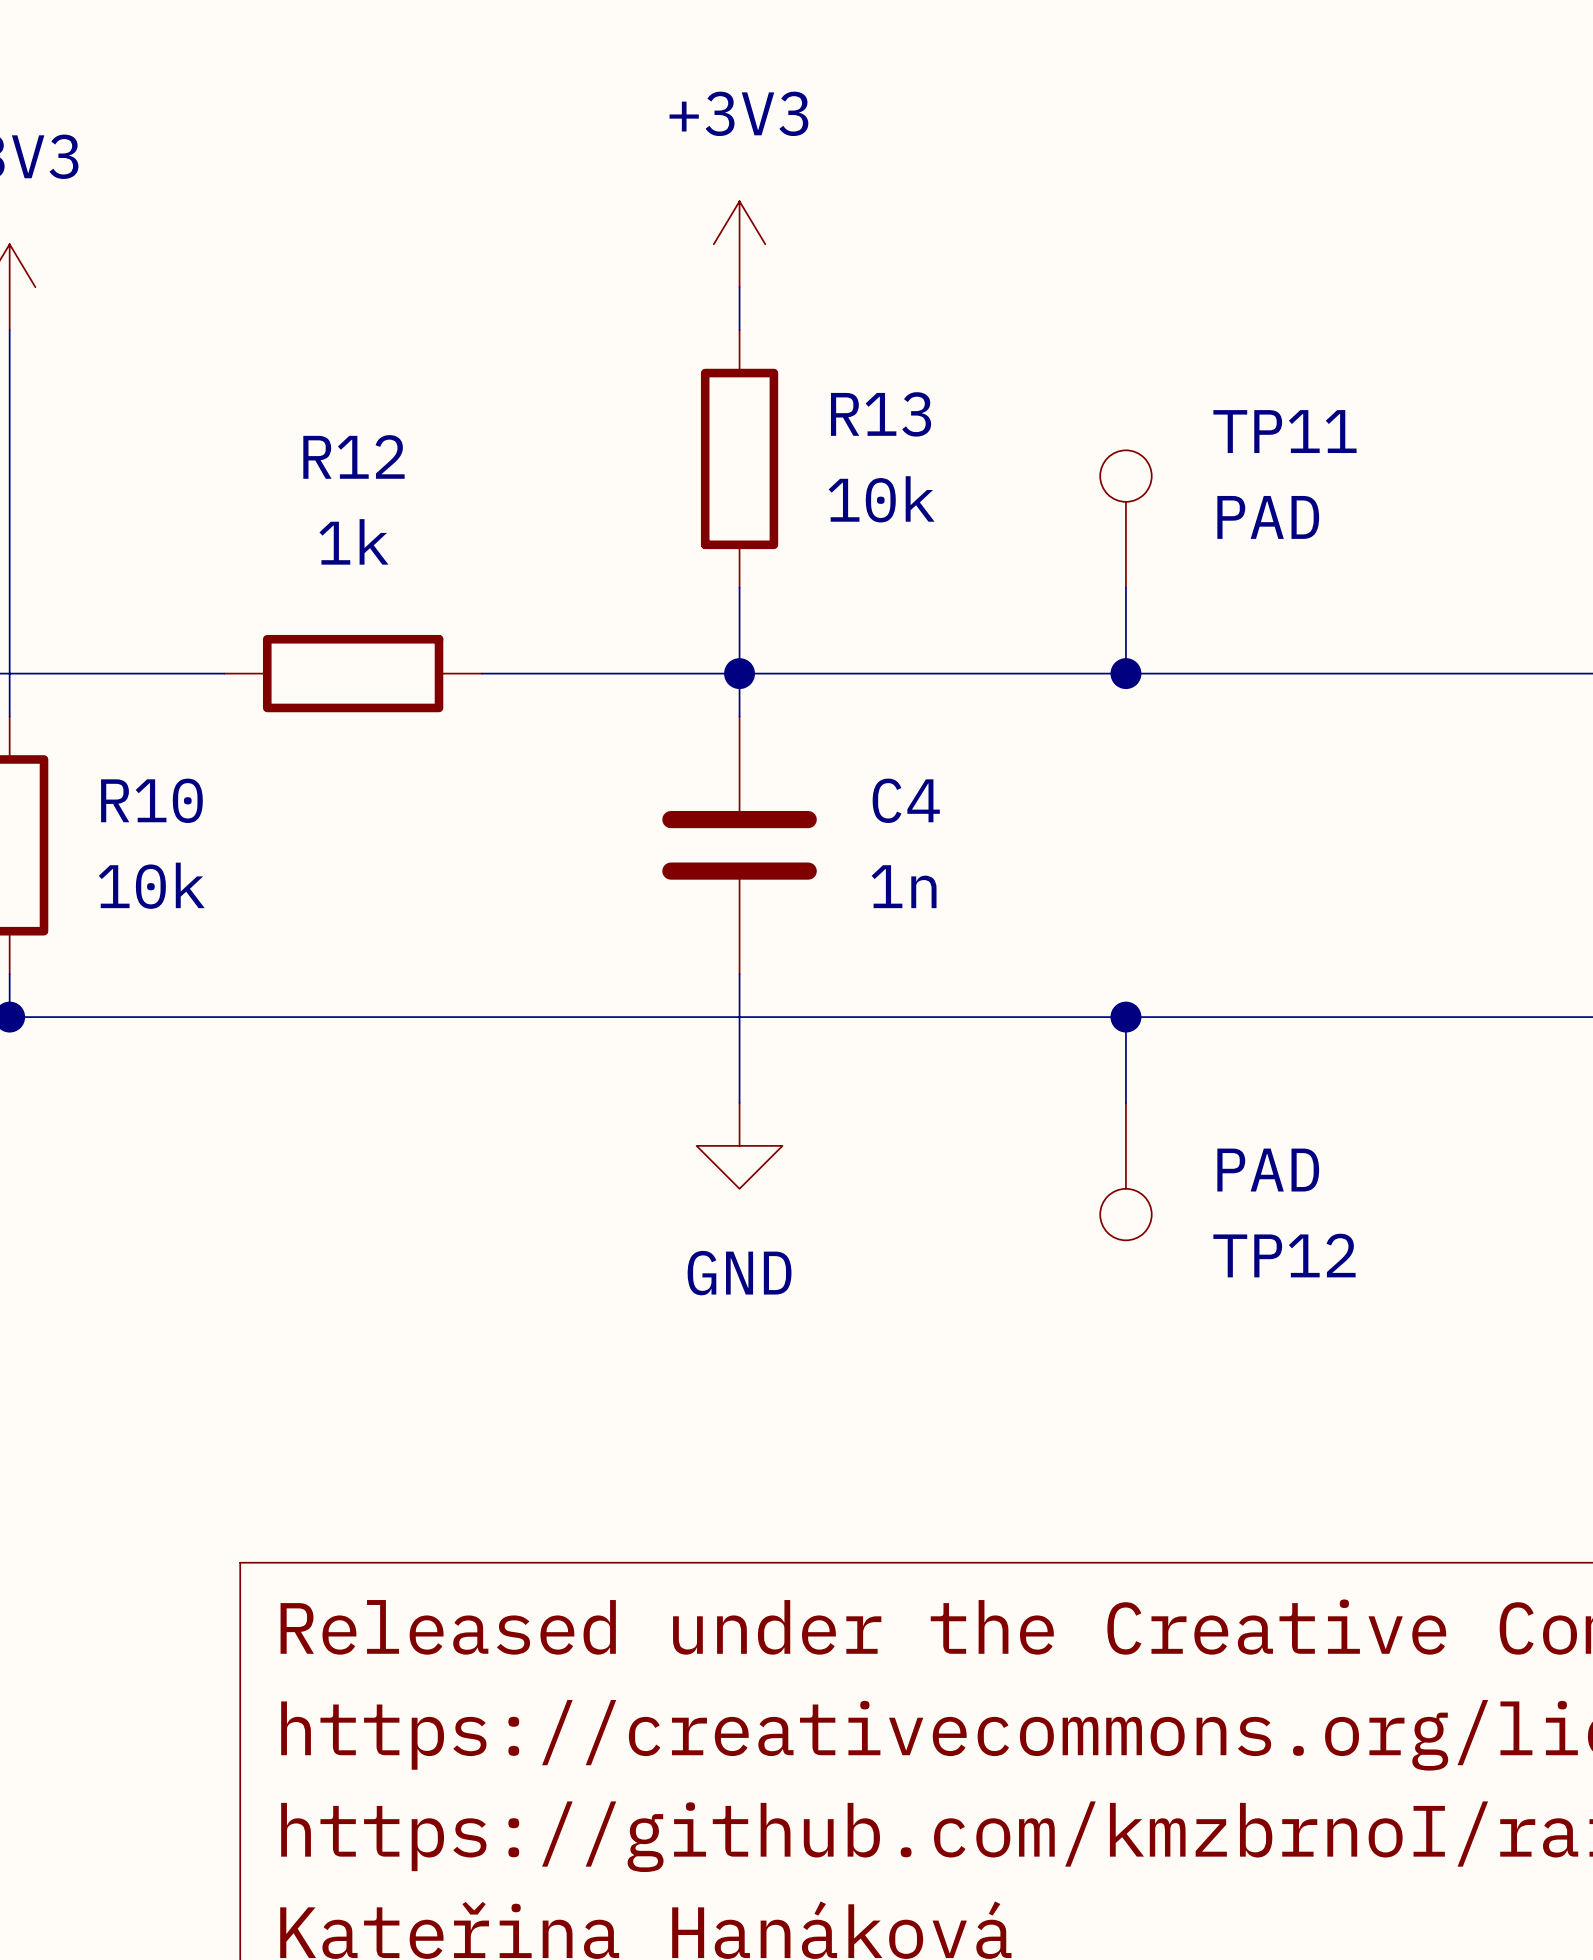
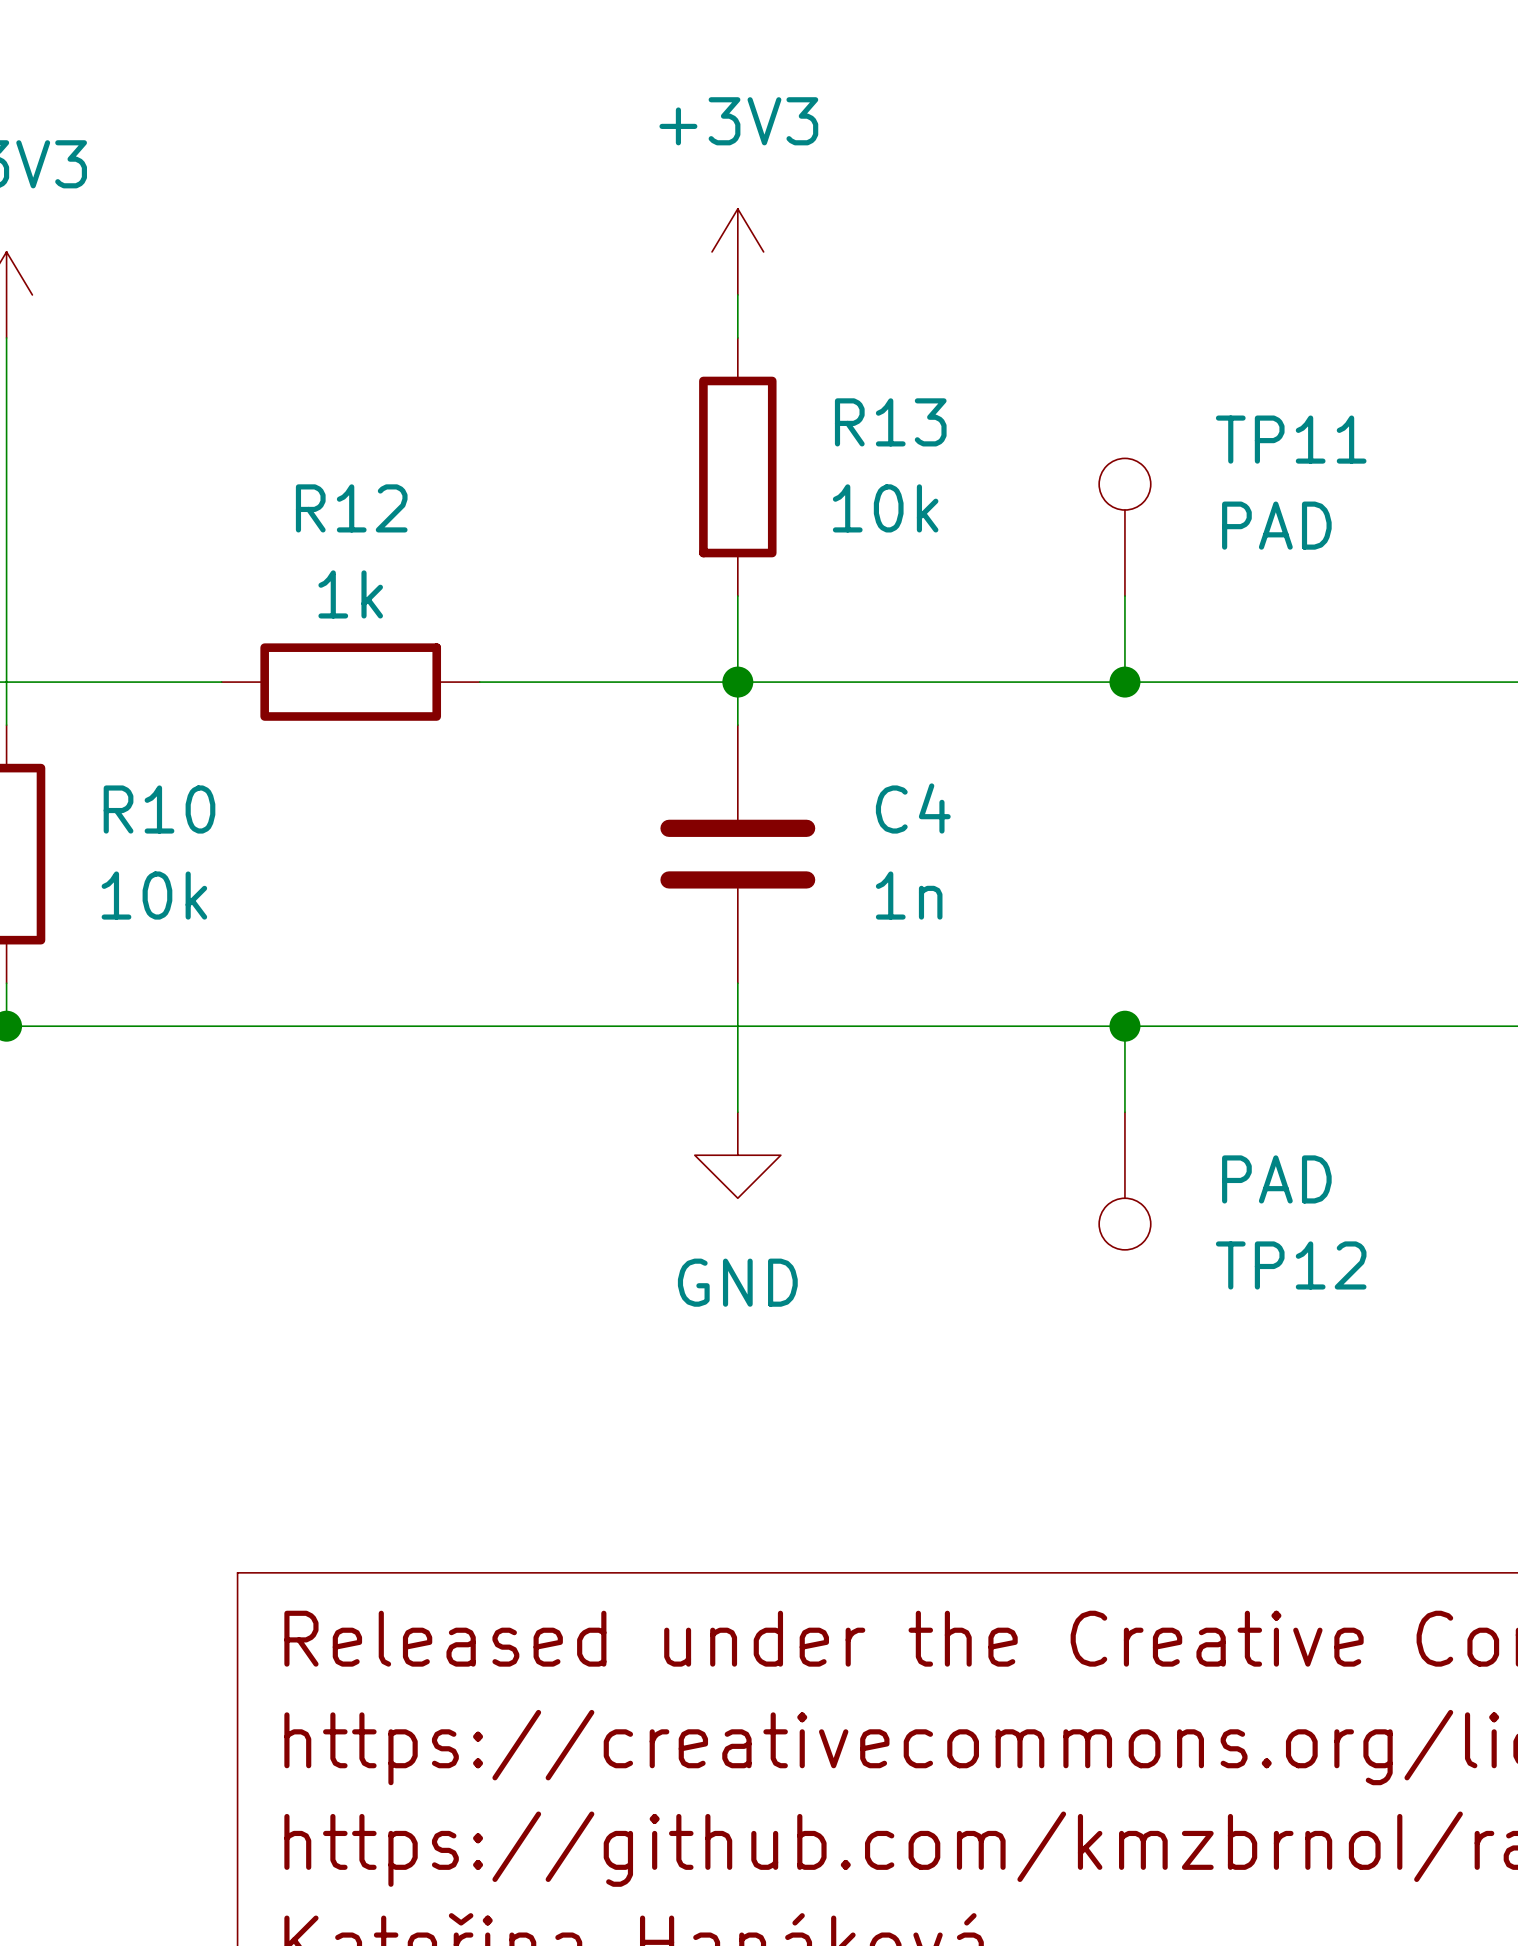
R12 name position: R12 (353, 456) -> R12 (351, 508)
R12 value position: 1k (353, 541) -> 1k (350, 594)

